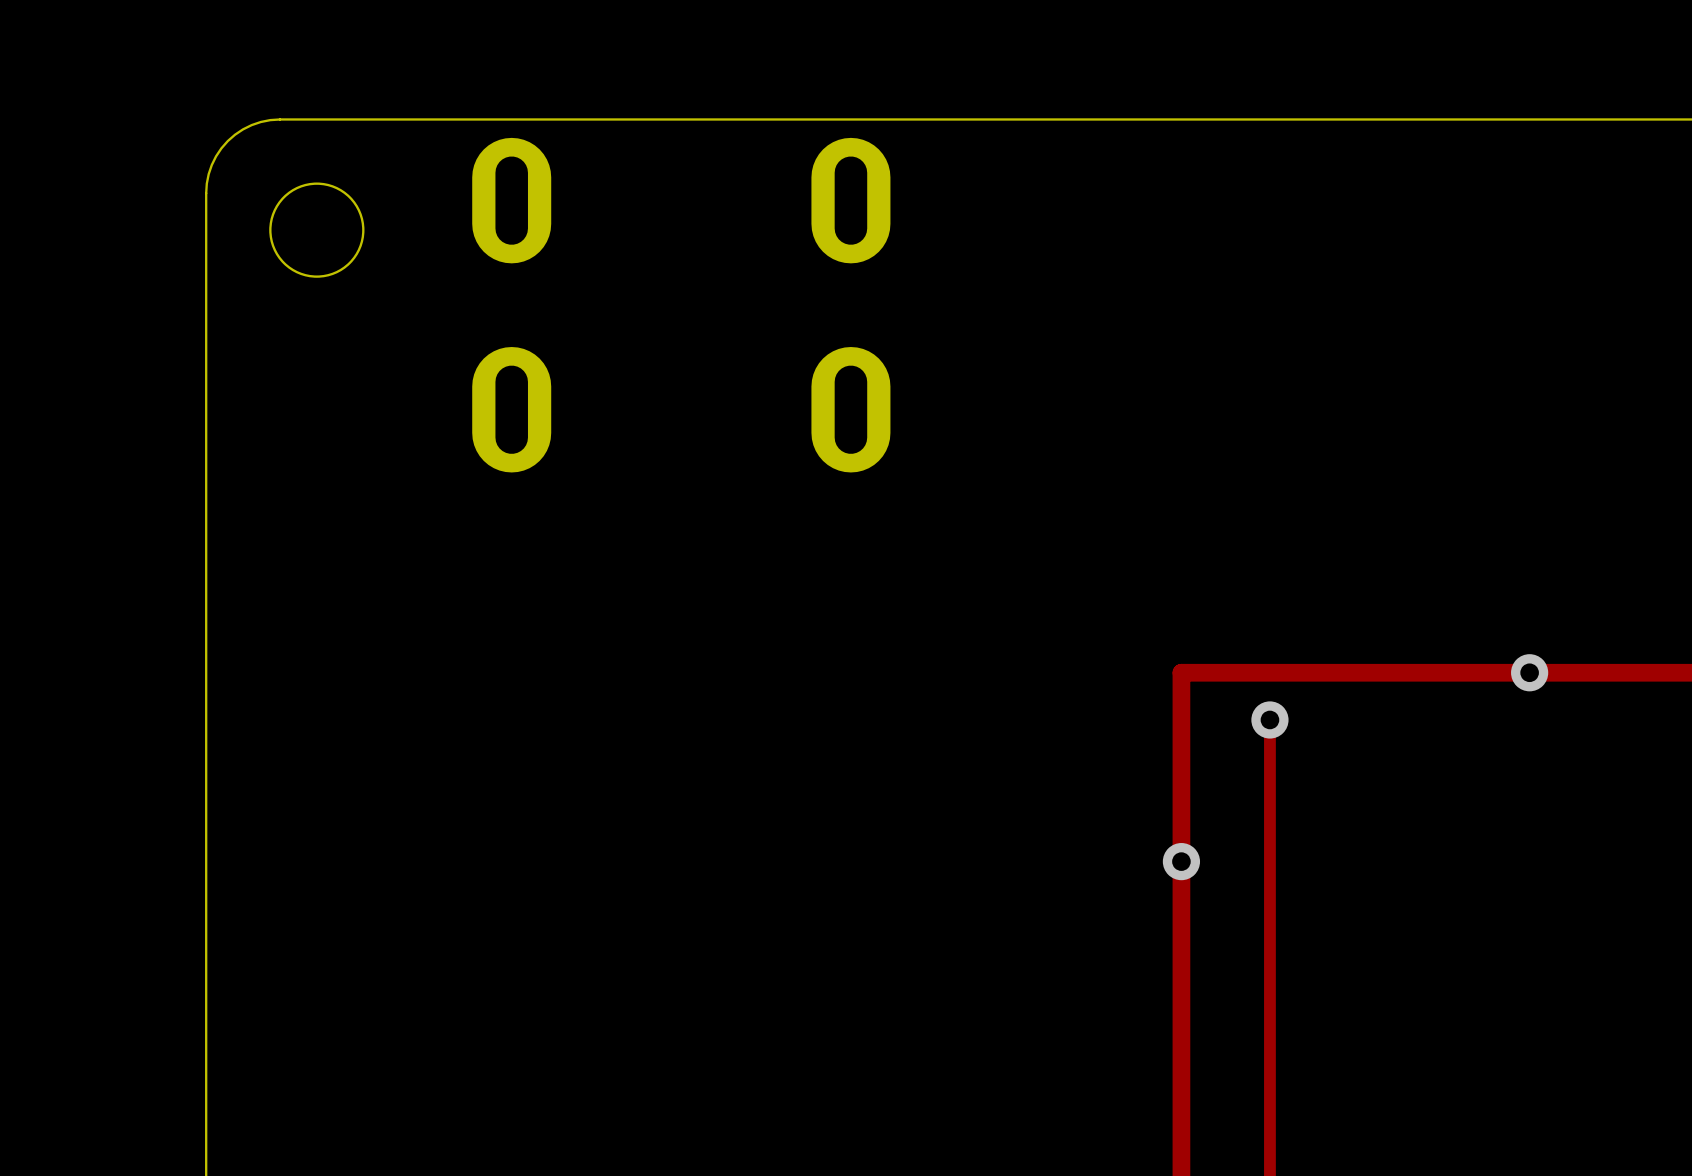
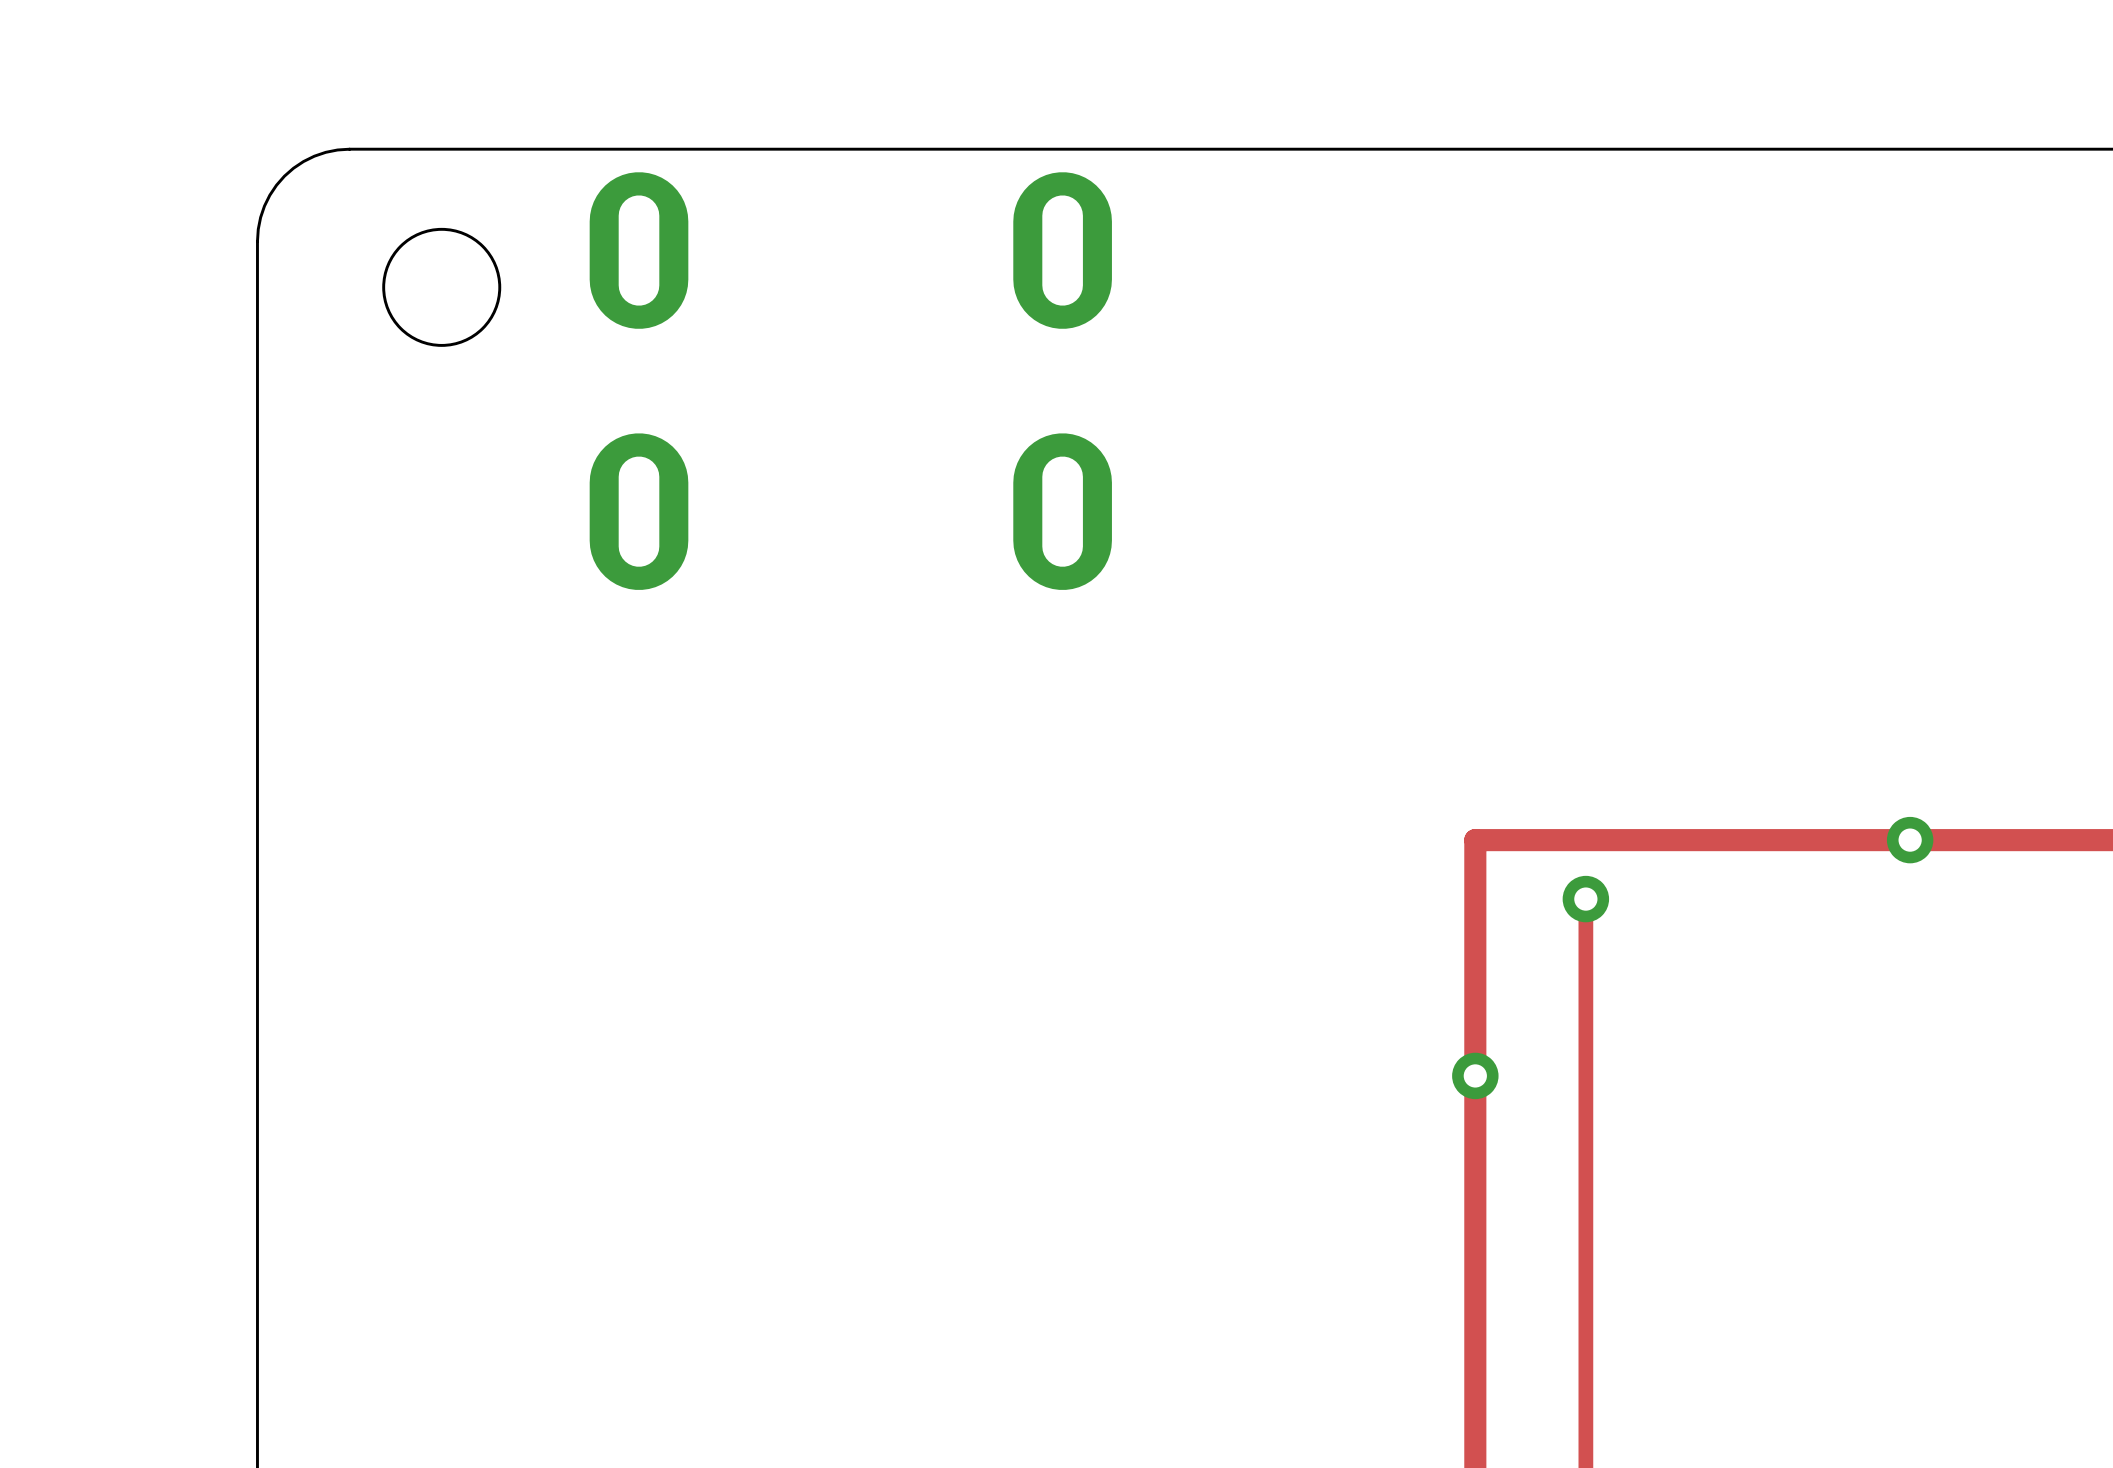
round board edge position: (316, 230) -> (441, 287)

